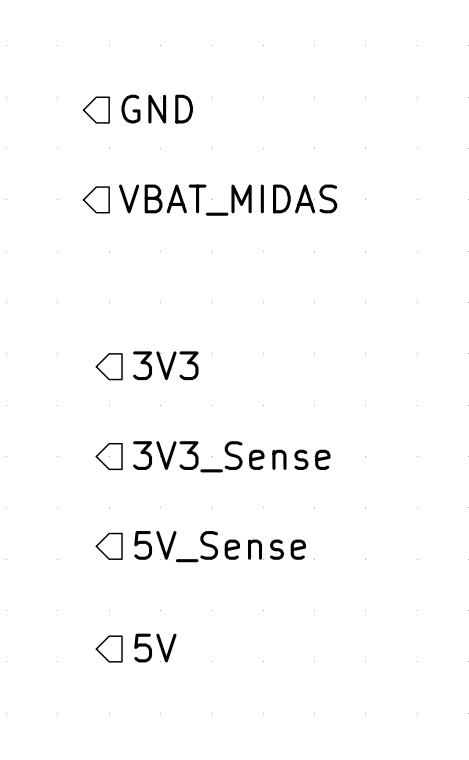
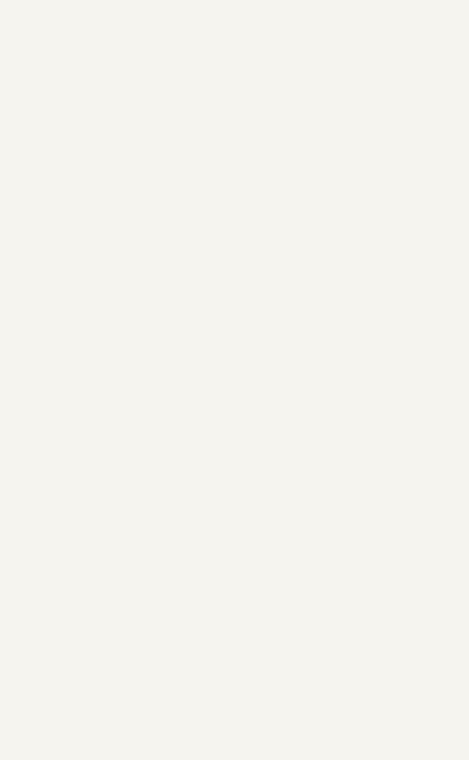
hierarchical label: GND (157, 109) -> none
hierarchical label: VBAT_MIDAS (228, 200) -> none
hierarchical label: 3V3 (165, 365) -> none
hierarchical label: 3V3_Sense (231, 456) -> none
hierarchical label: 5V_Sense (220, 546) -> none
hierarchical label: 5V (155, 648) -> none

